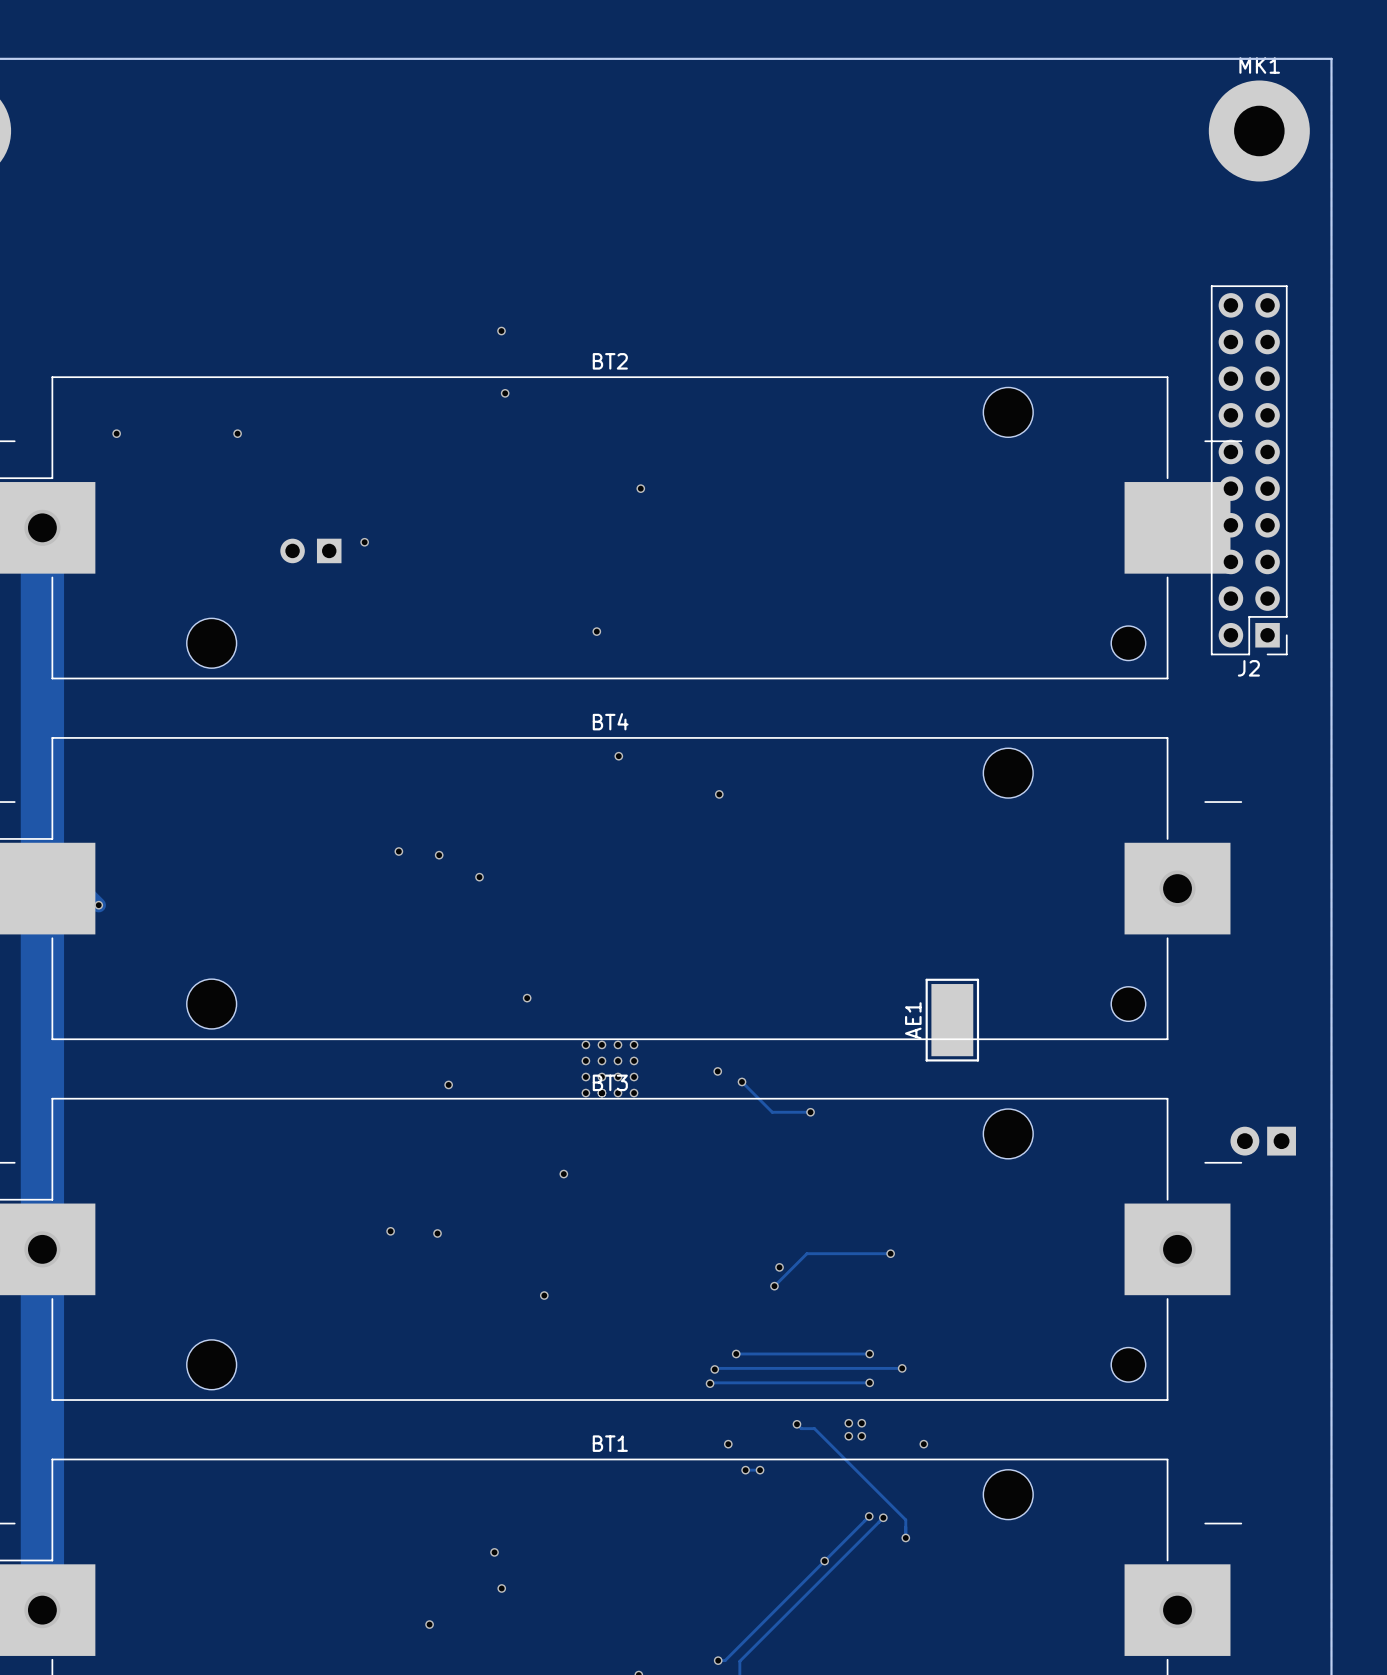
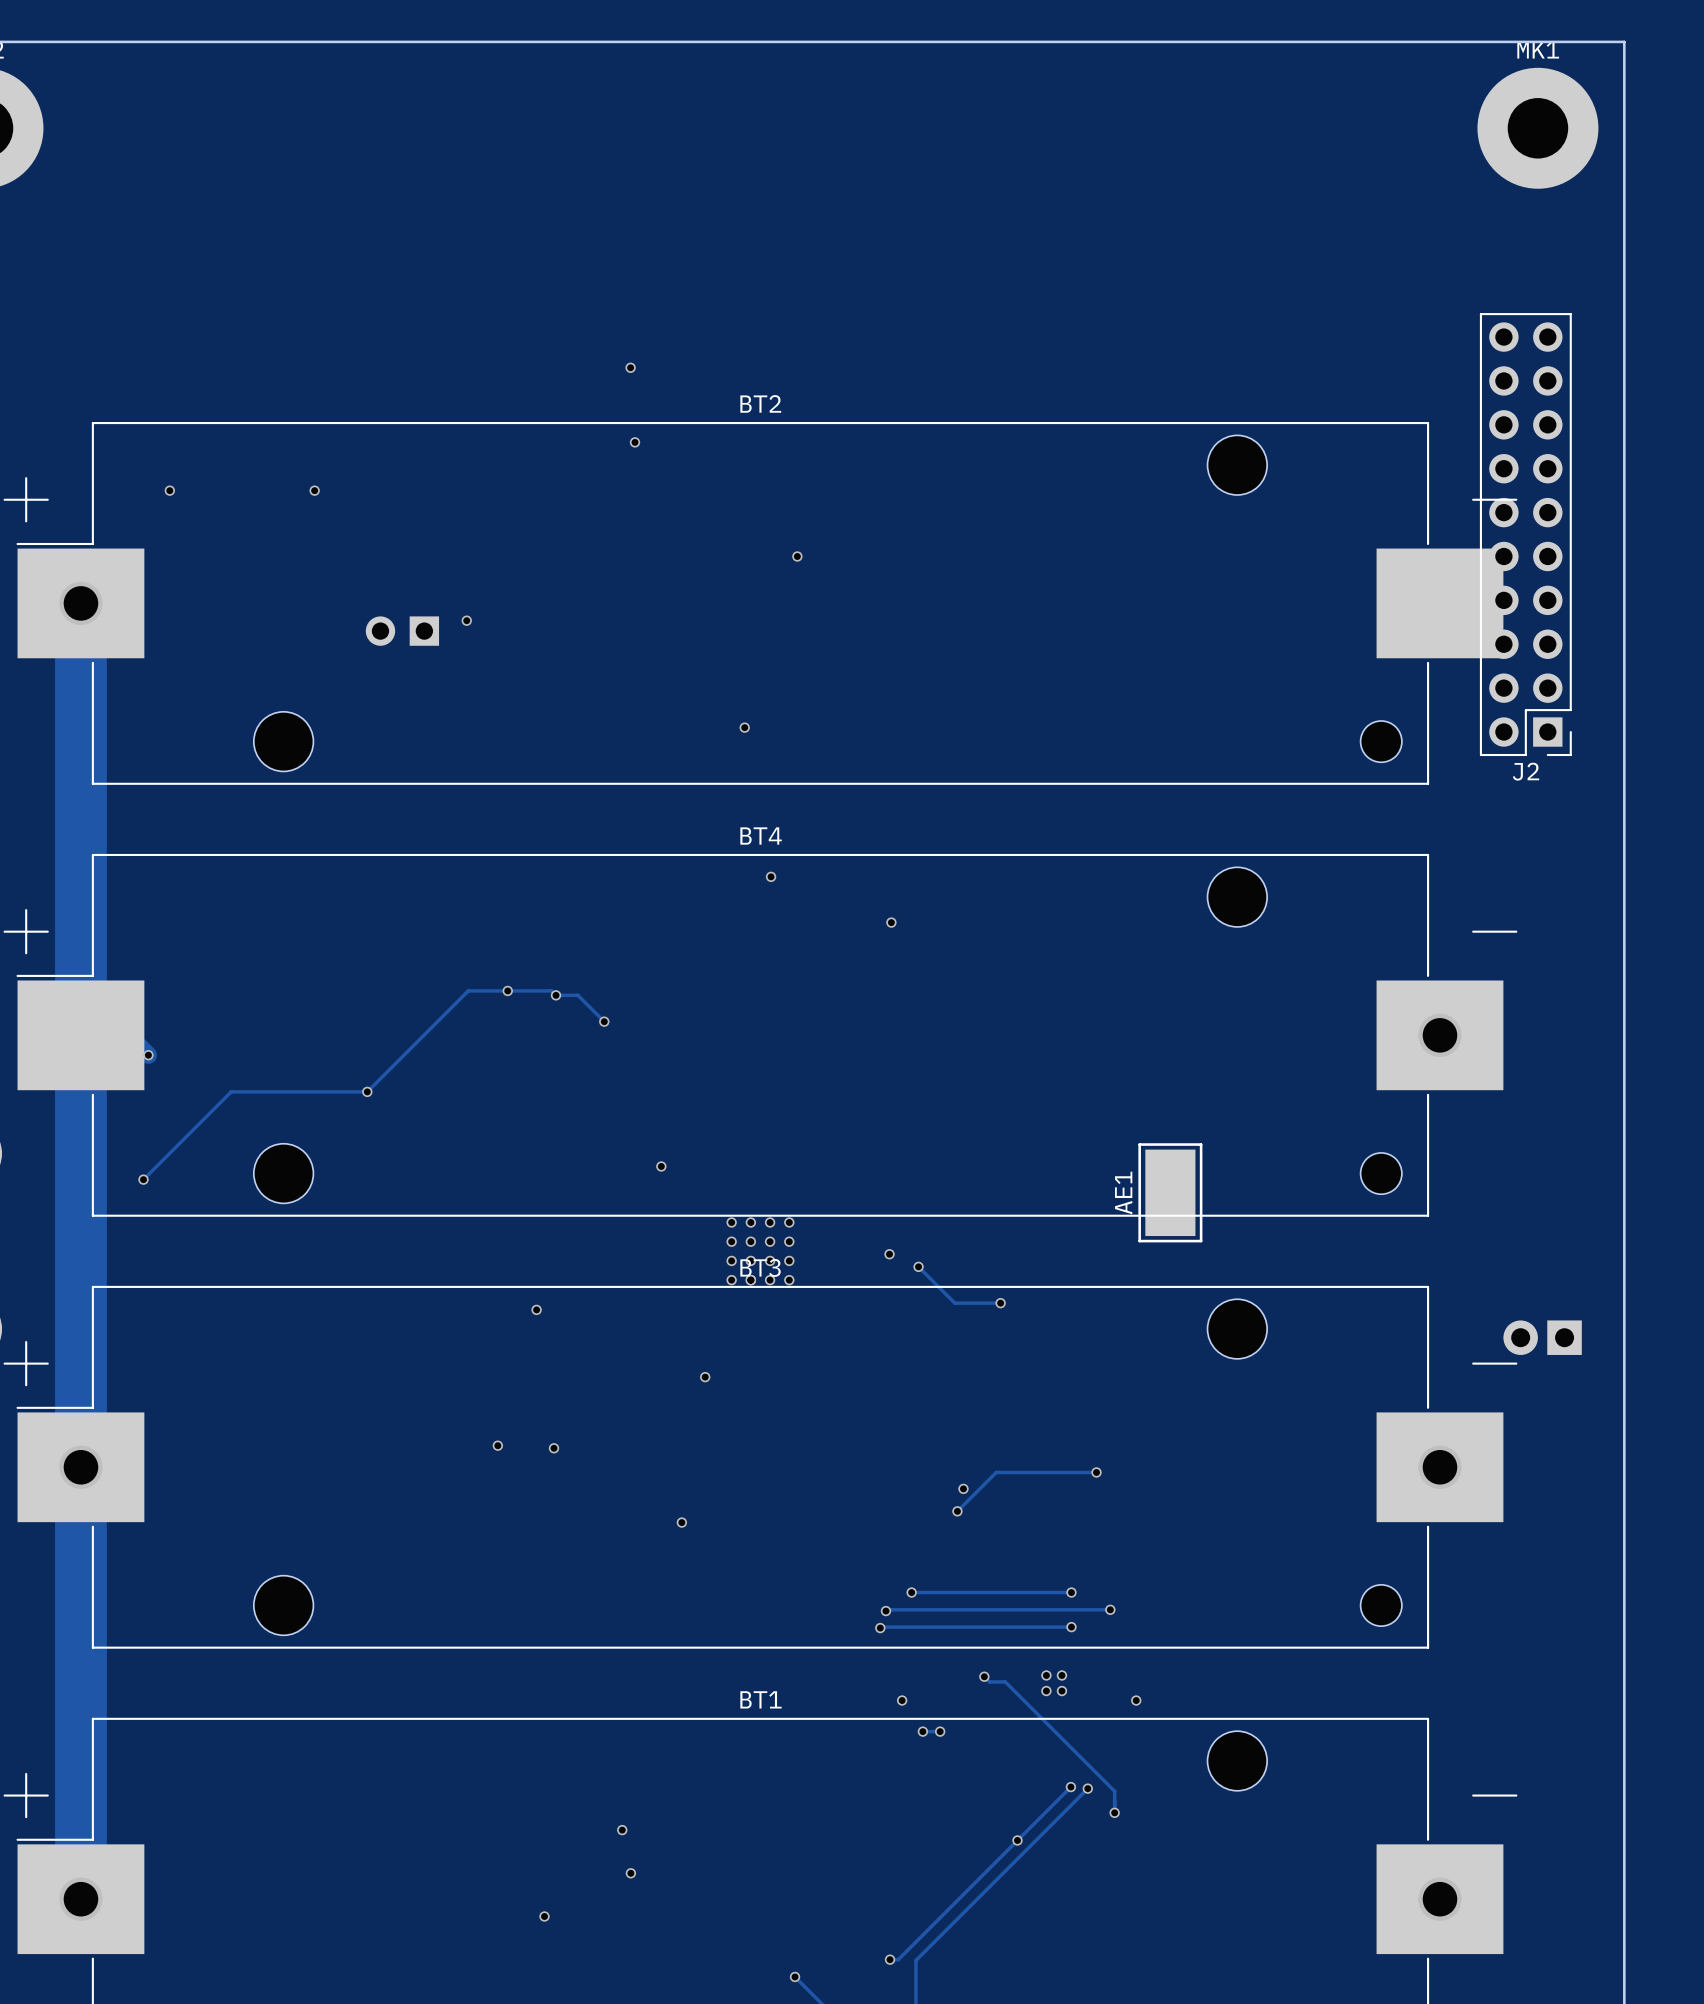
track: none -> (604, 1021) (577, 995) (556, 995) (551, 990) (468, 990) (367, 1091) (231, 1091) (143, 1179)
via: none -> (367, 1091)
via: none -> (143, 1179)
via position: (448, 1084) -> (536, 1309)

